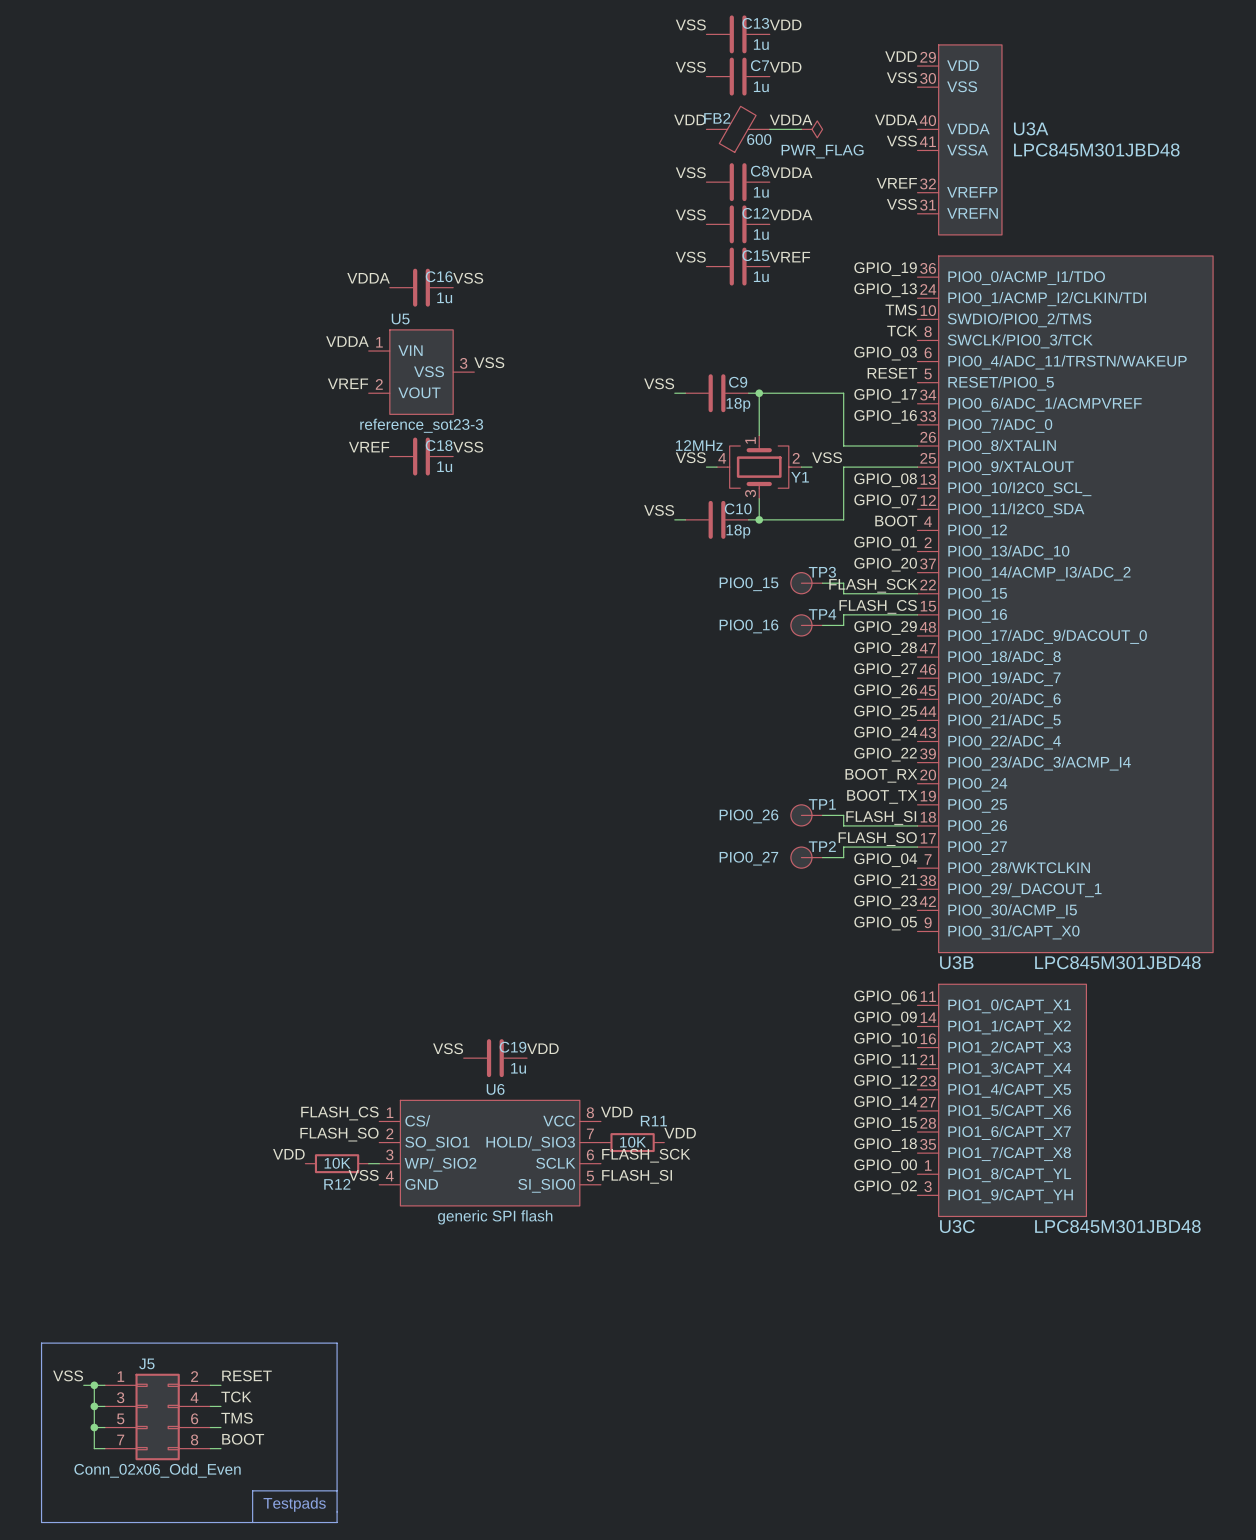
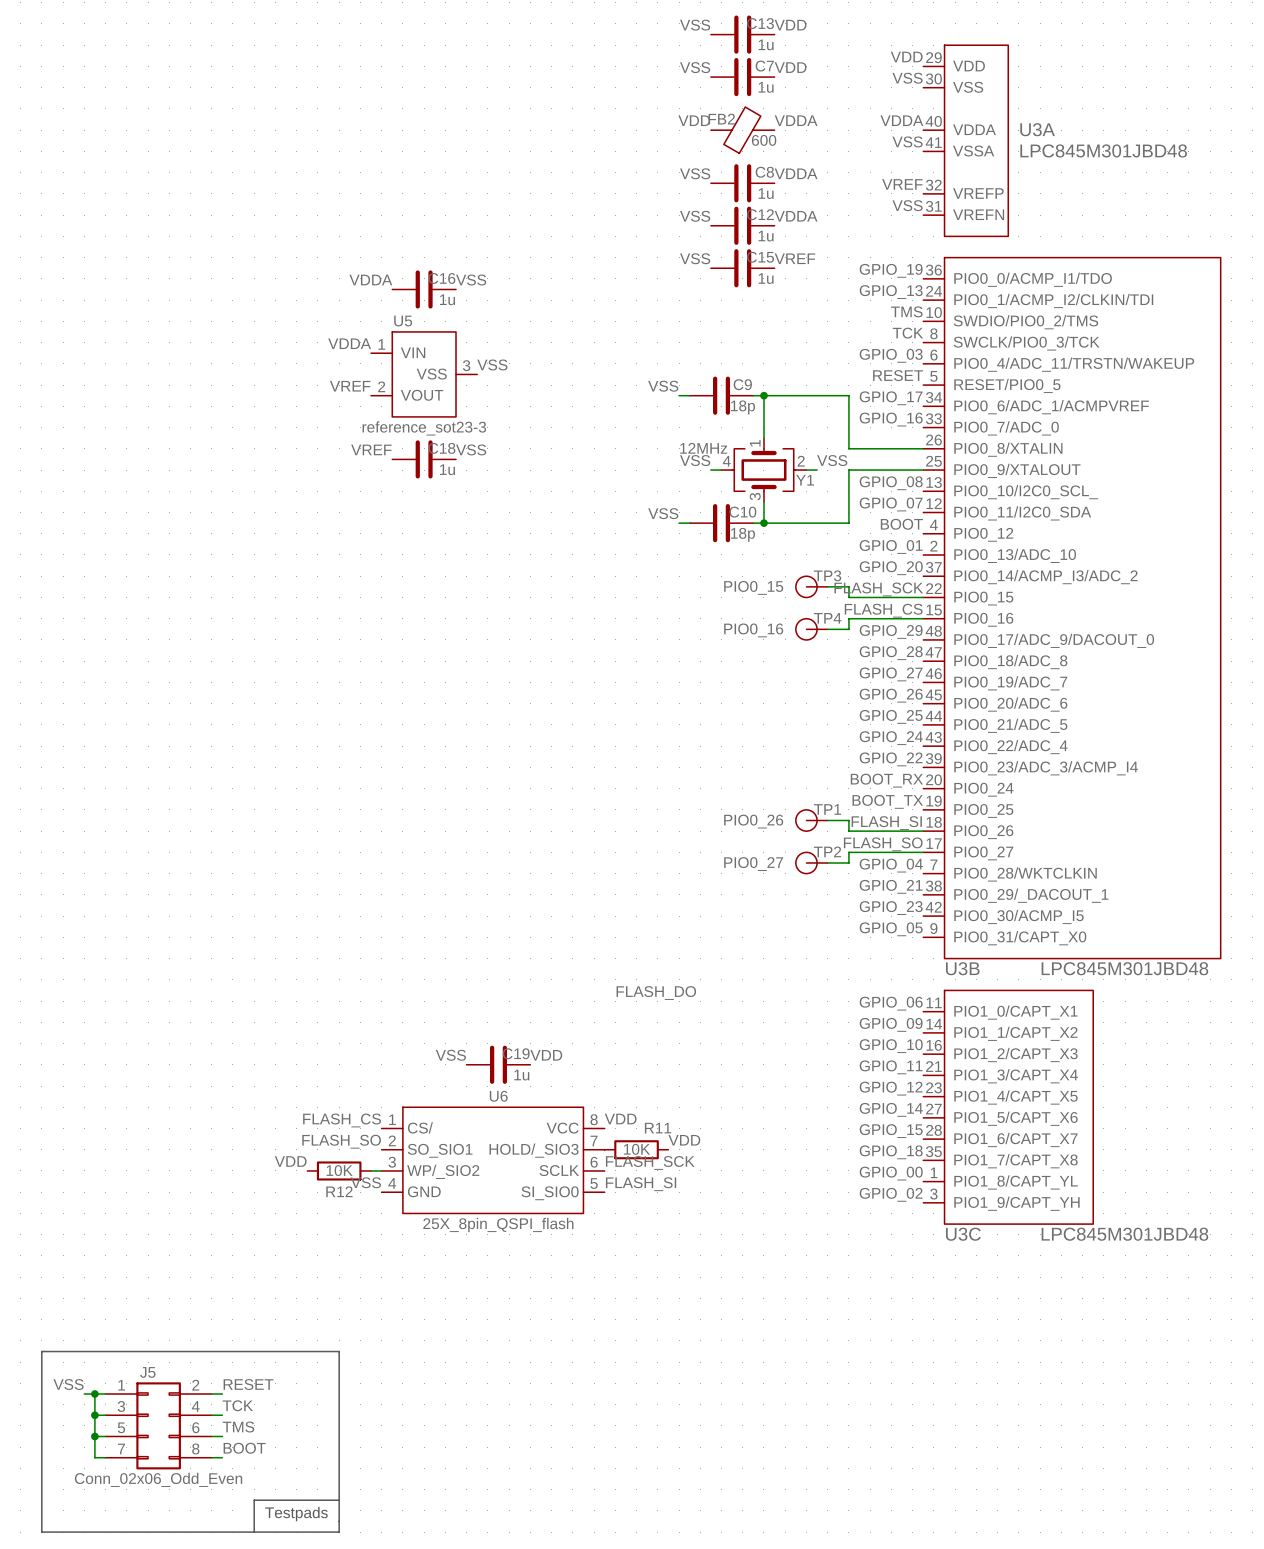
wire: (769, 129) (801, 129) -> none
power symbol: PWR_FLAG (812, 129) -> none
label: none -> FLASH_DO (656, 993)
U6 value: generic SPI flash (495, 1217) -> 25X_8pin_QSPI_flash (498, 1225)

